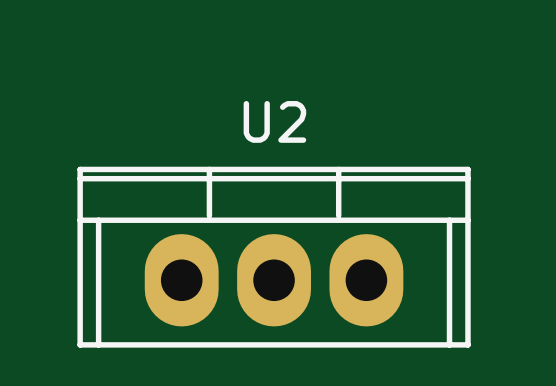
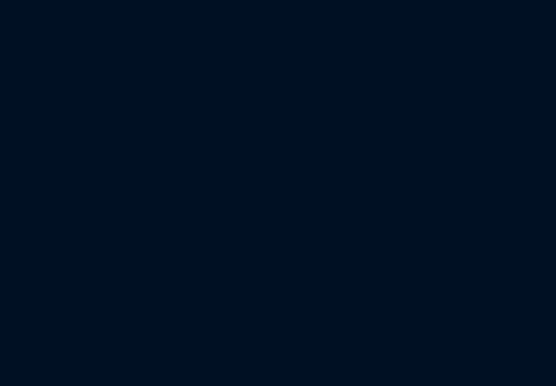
U2: (274, 257) -> none

